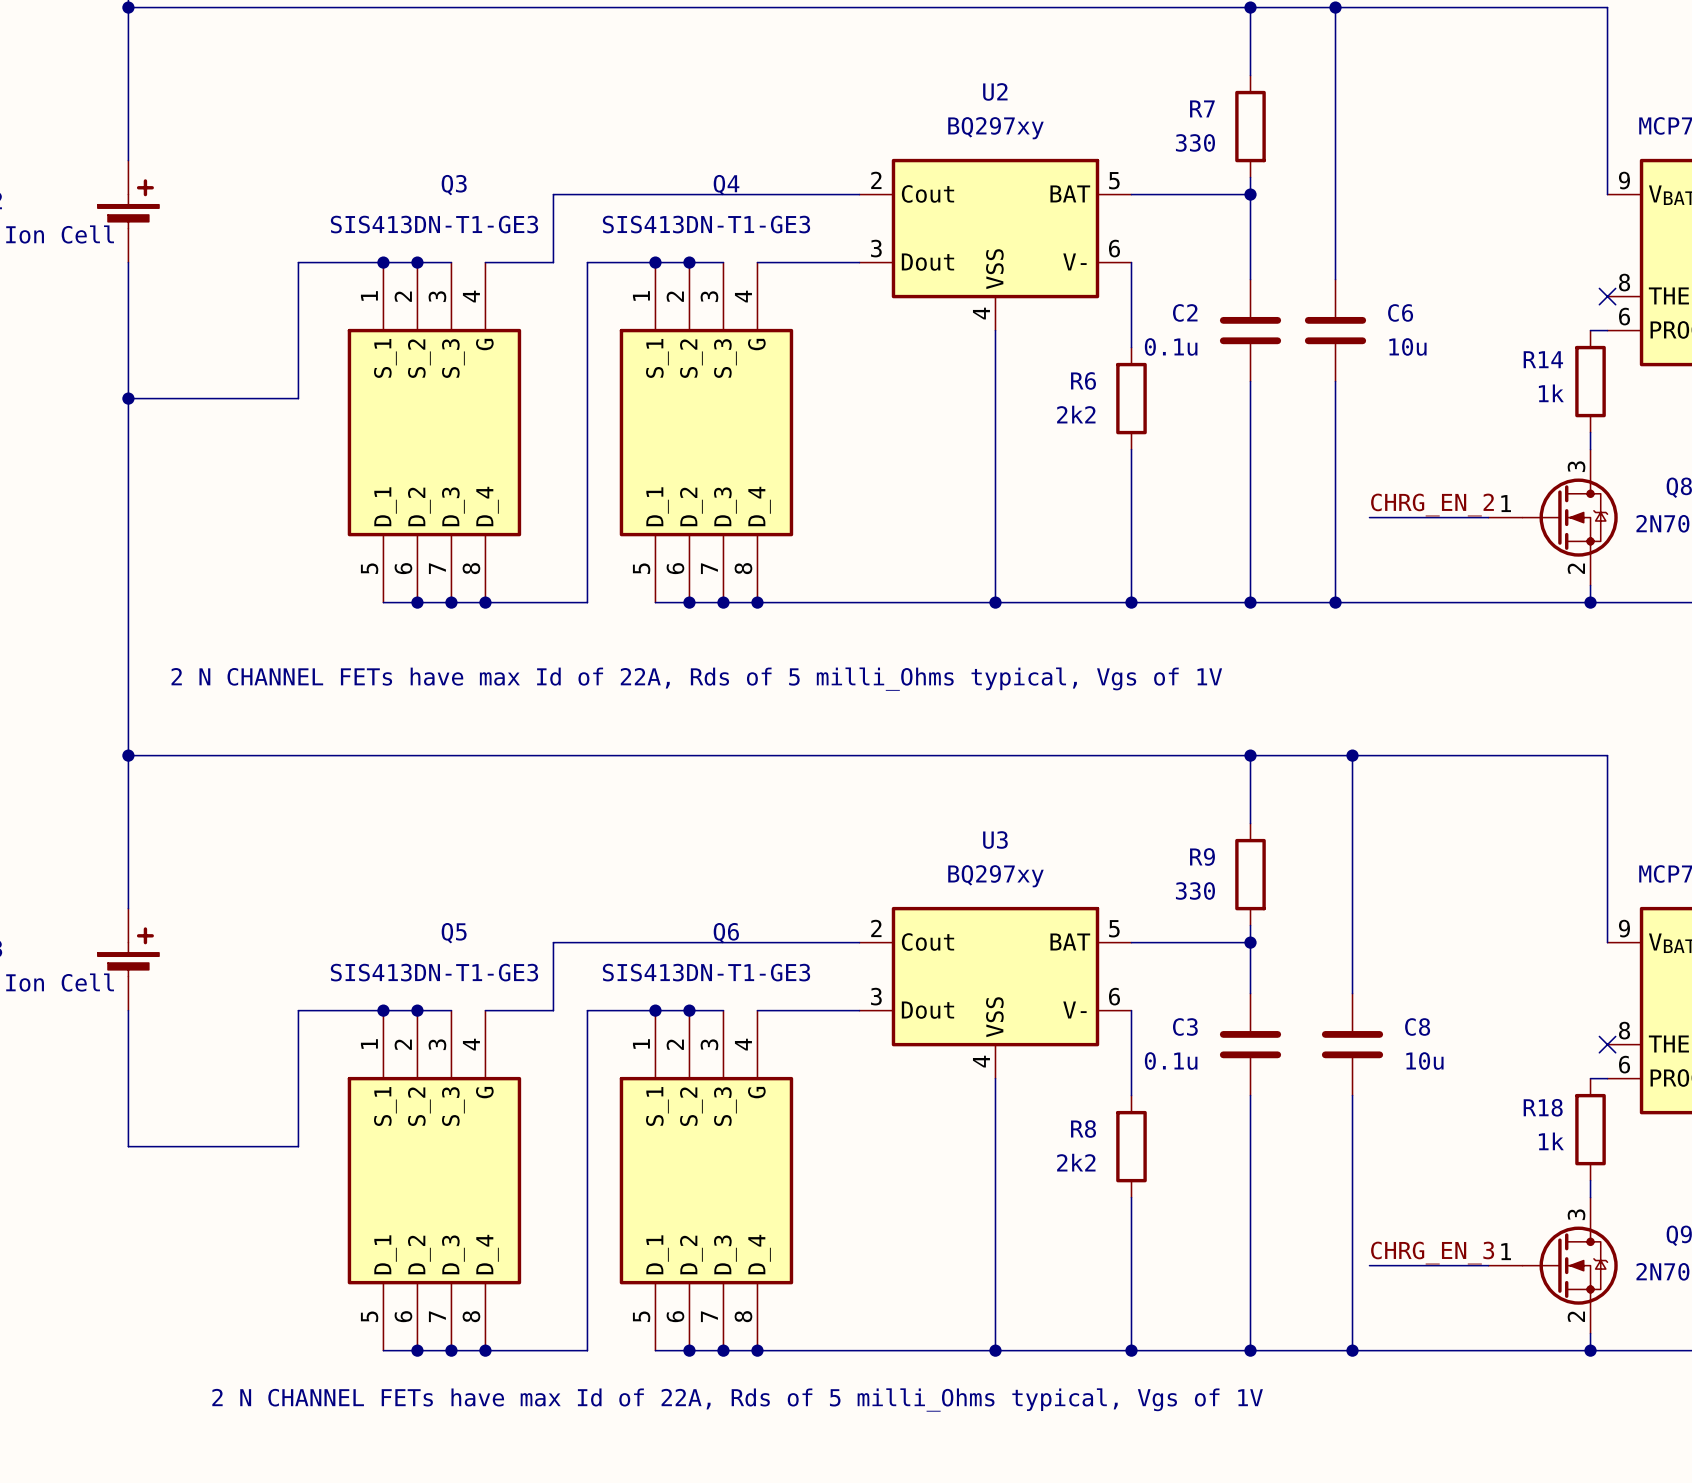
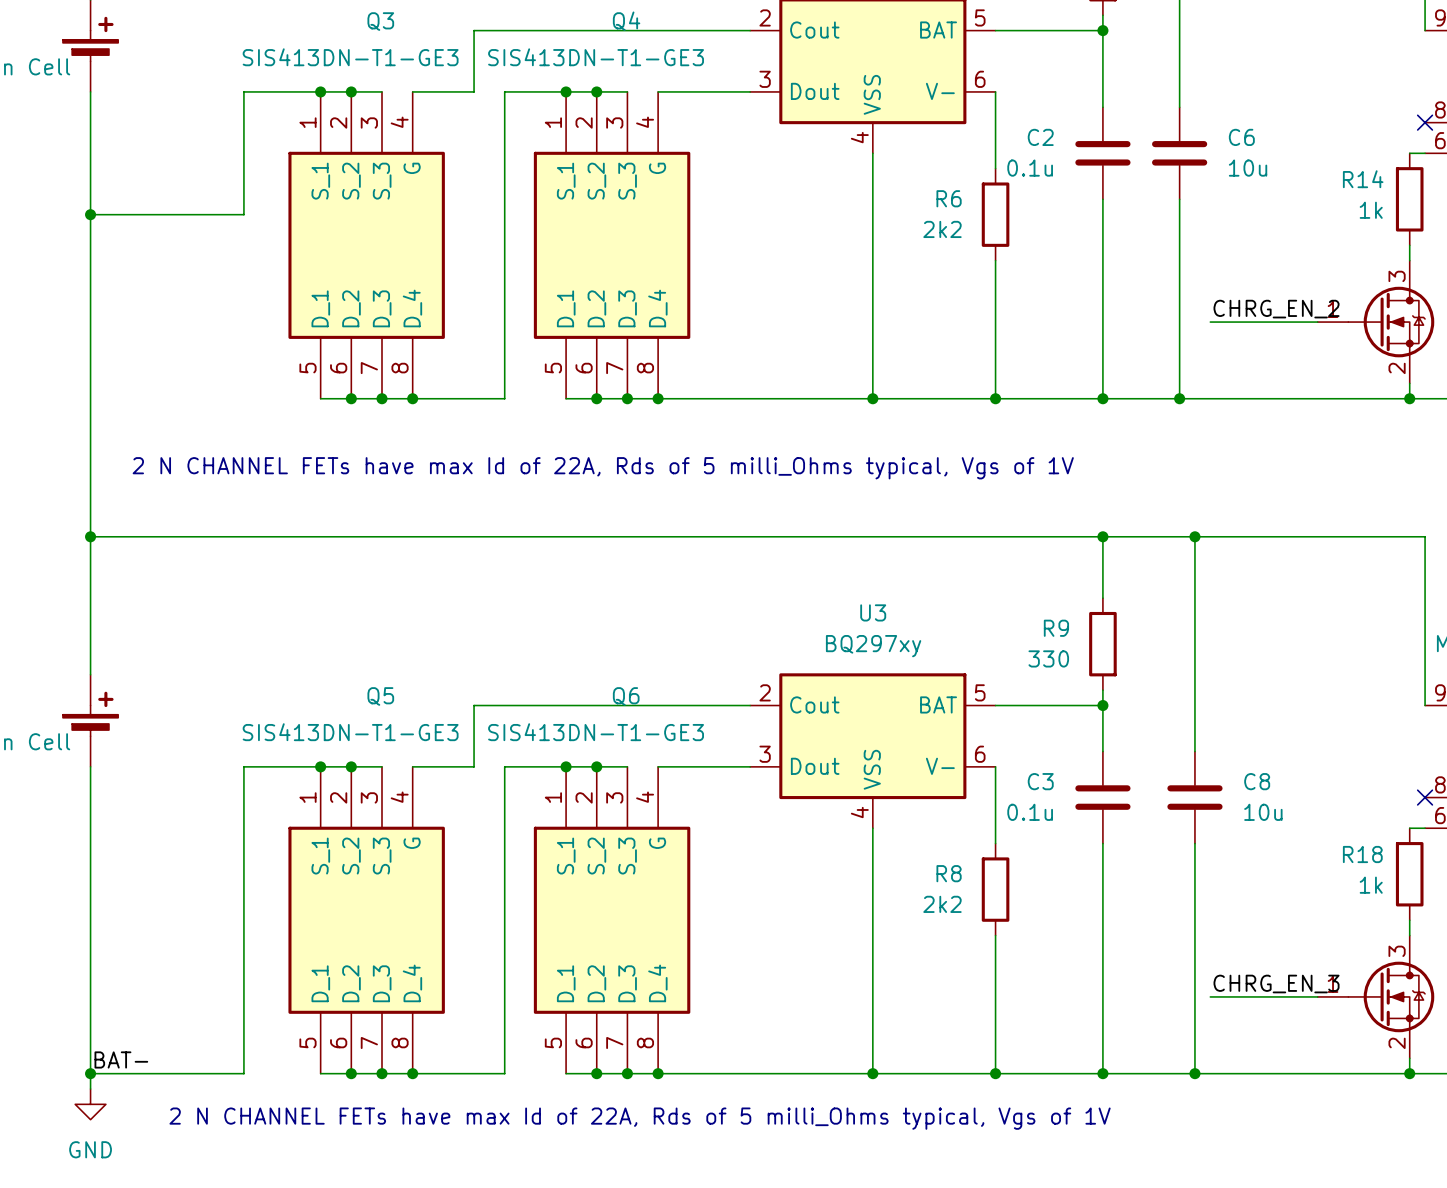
wire: (128, 1146) (298, 1146) -> (90, 1073) (243, 1073) (243, 889)
wire: none -> (90, 889) (90, 1089)
label: none -> BAT- (121, 1059)
junction: none -> (90, 1073)
power symbol: none -> GND (90, 1104)

